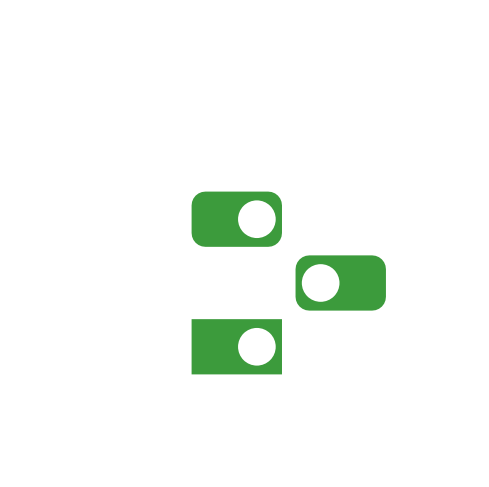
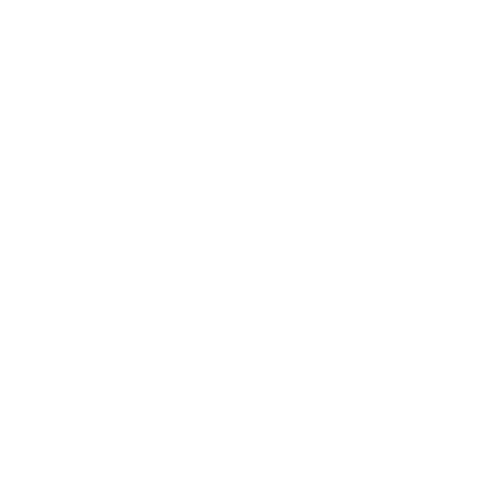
part: (288, 282) -> none

